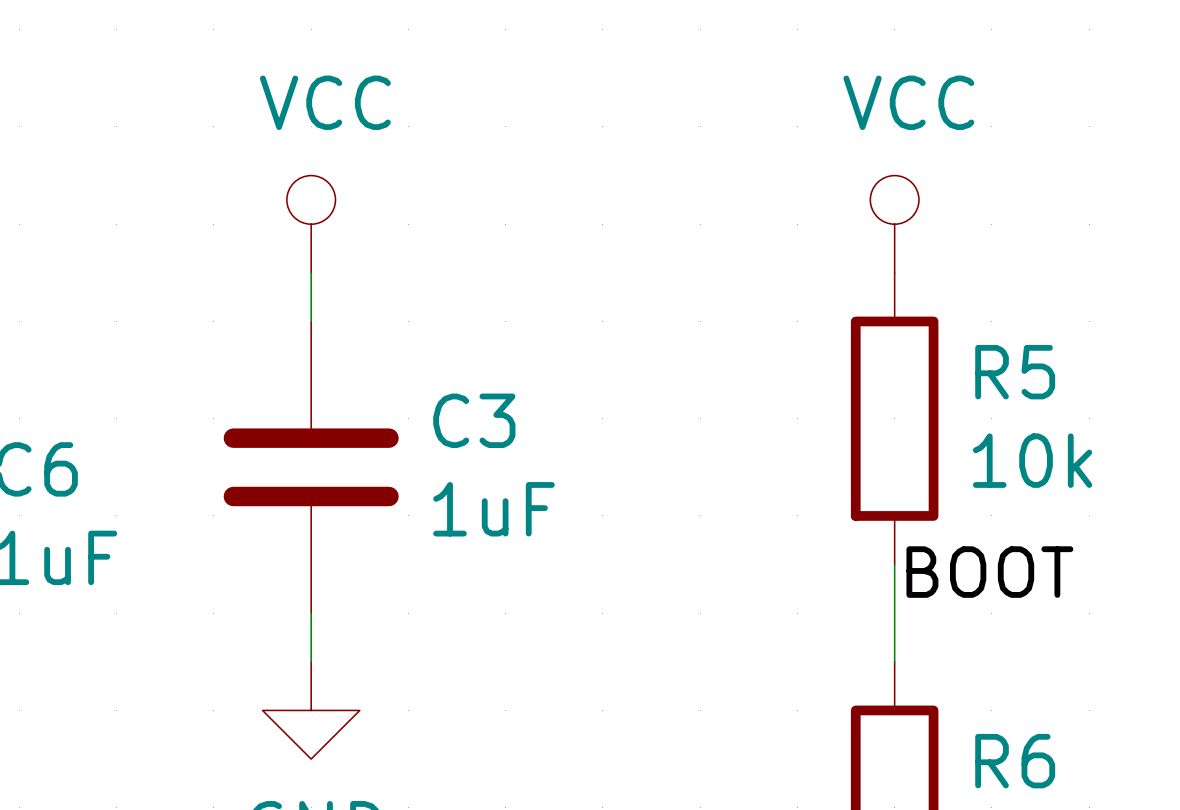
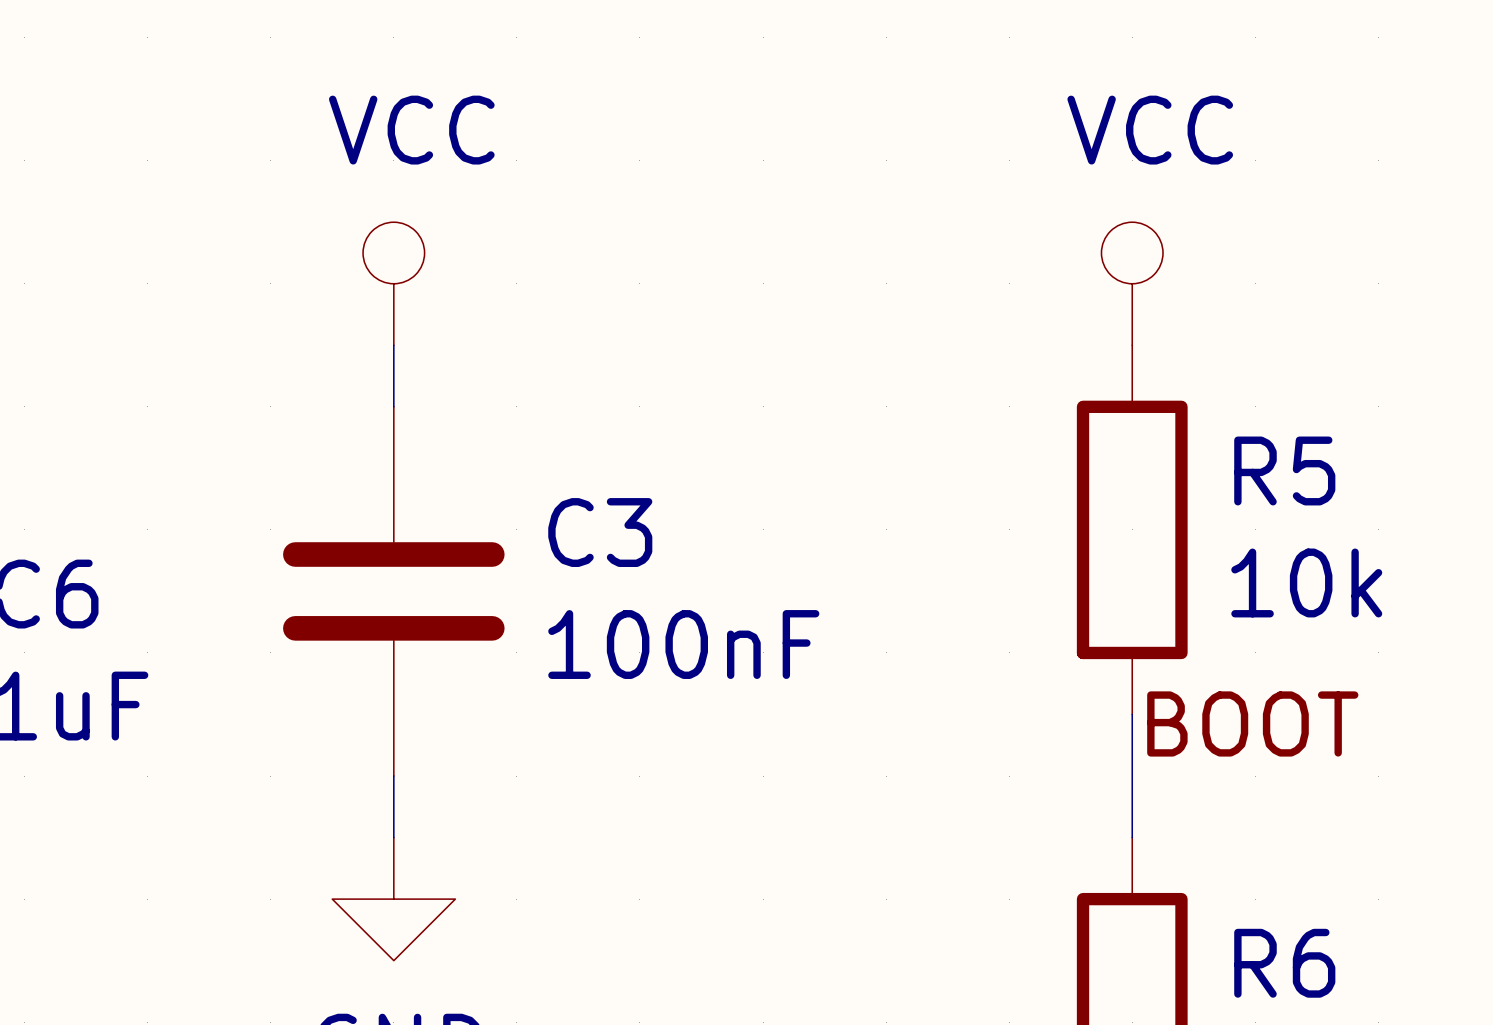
C3 value: 1uF (494, 509) -> 100nF (683, 644)

